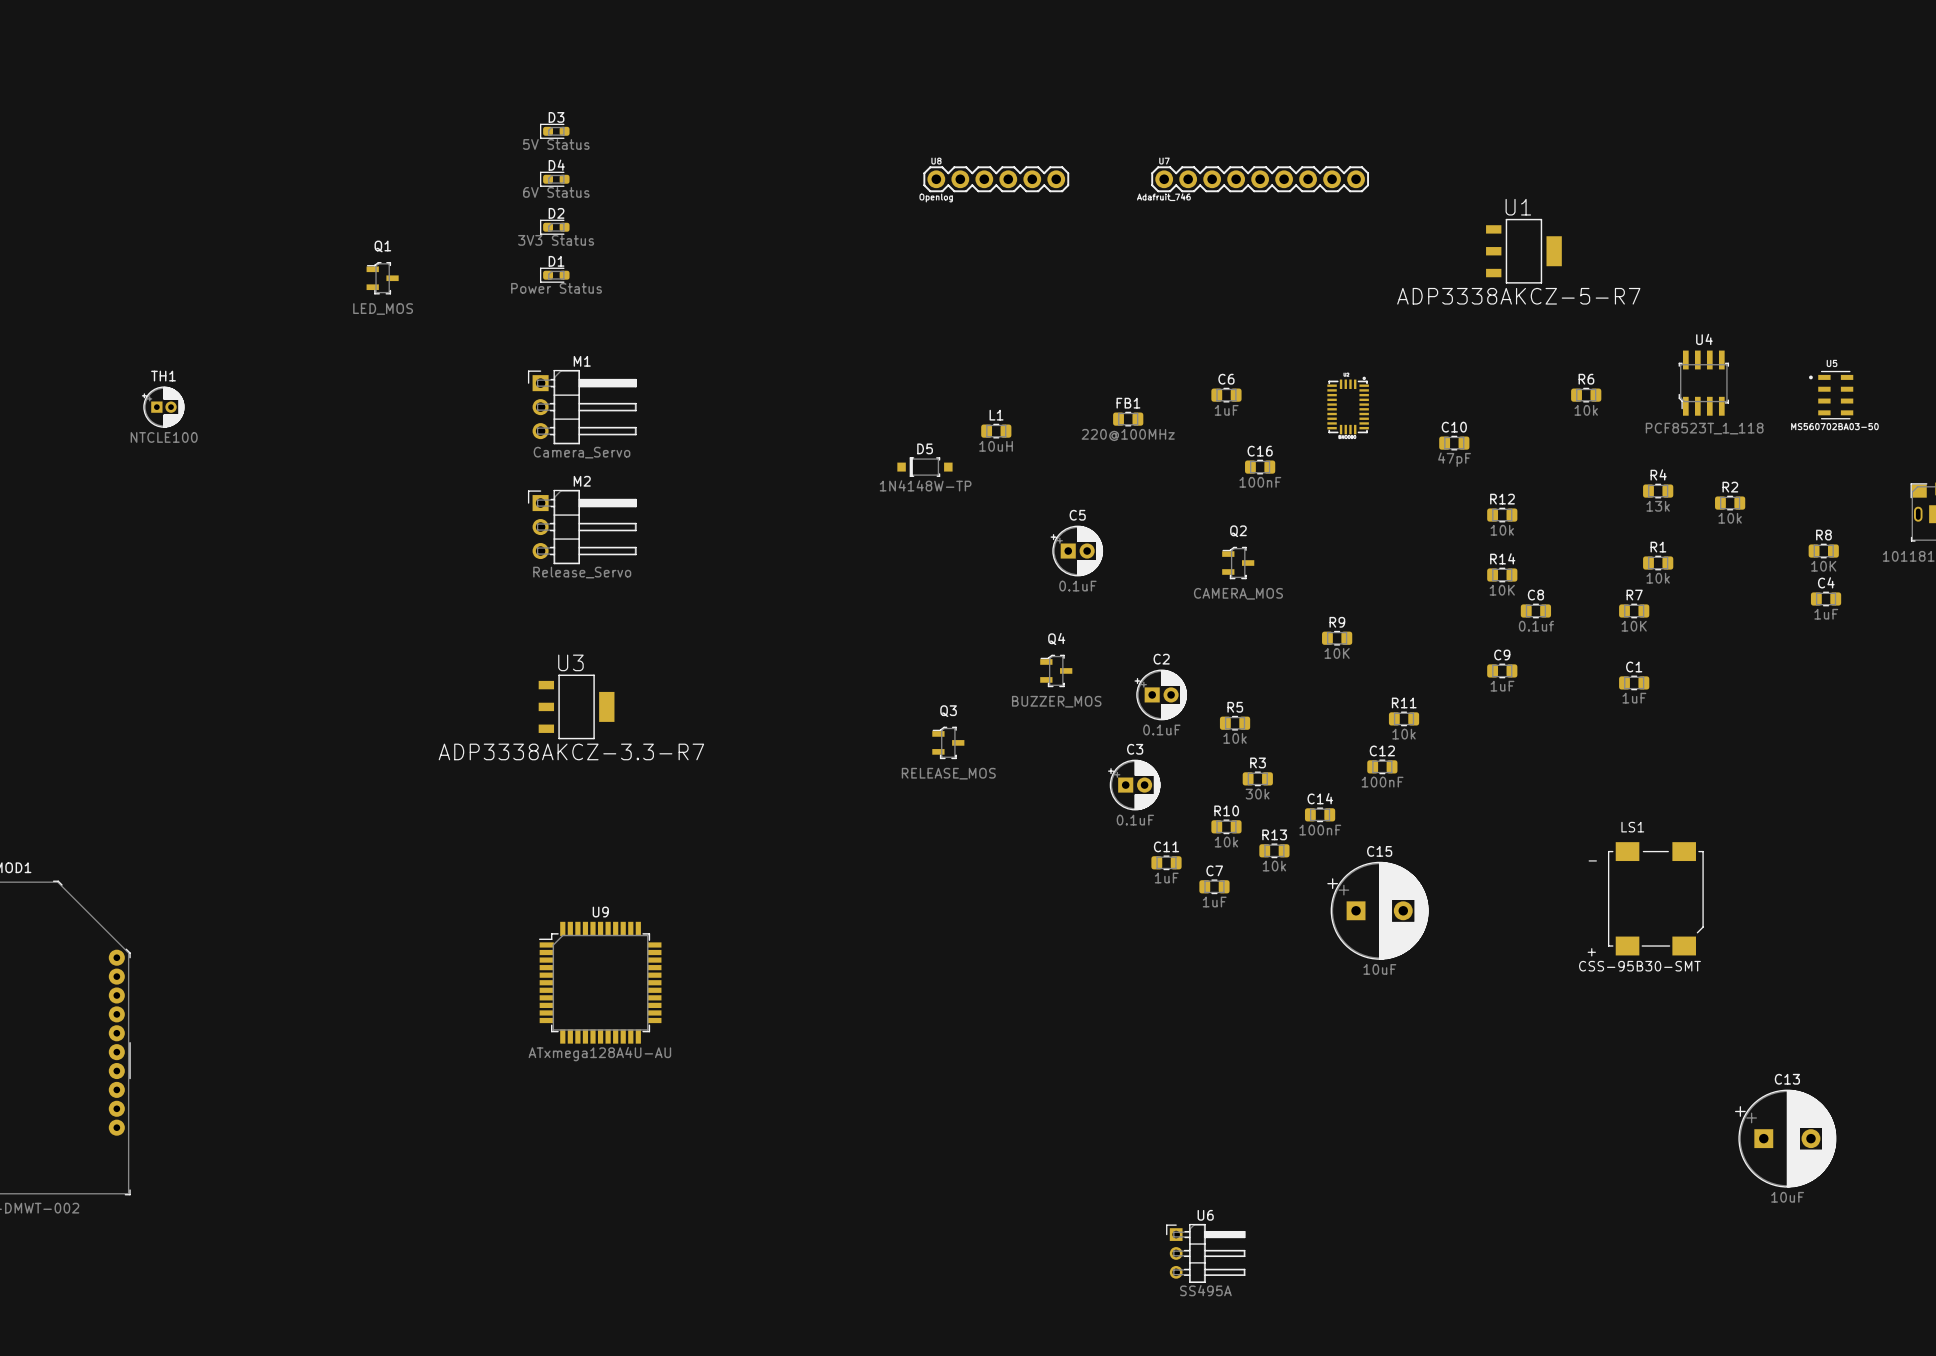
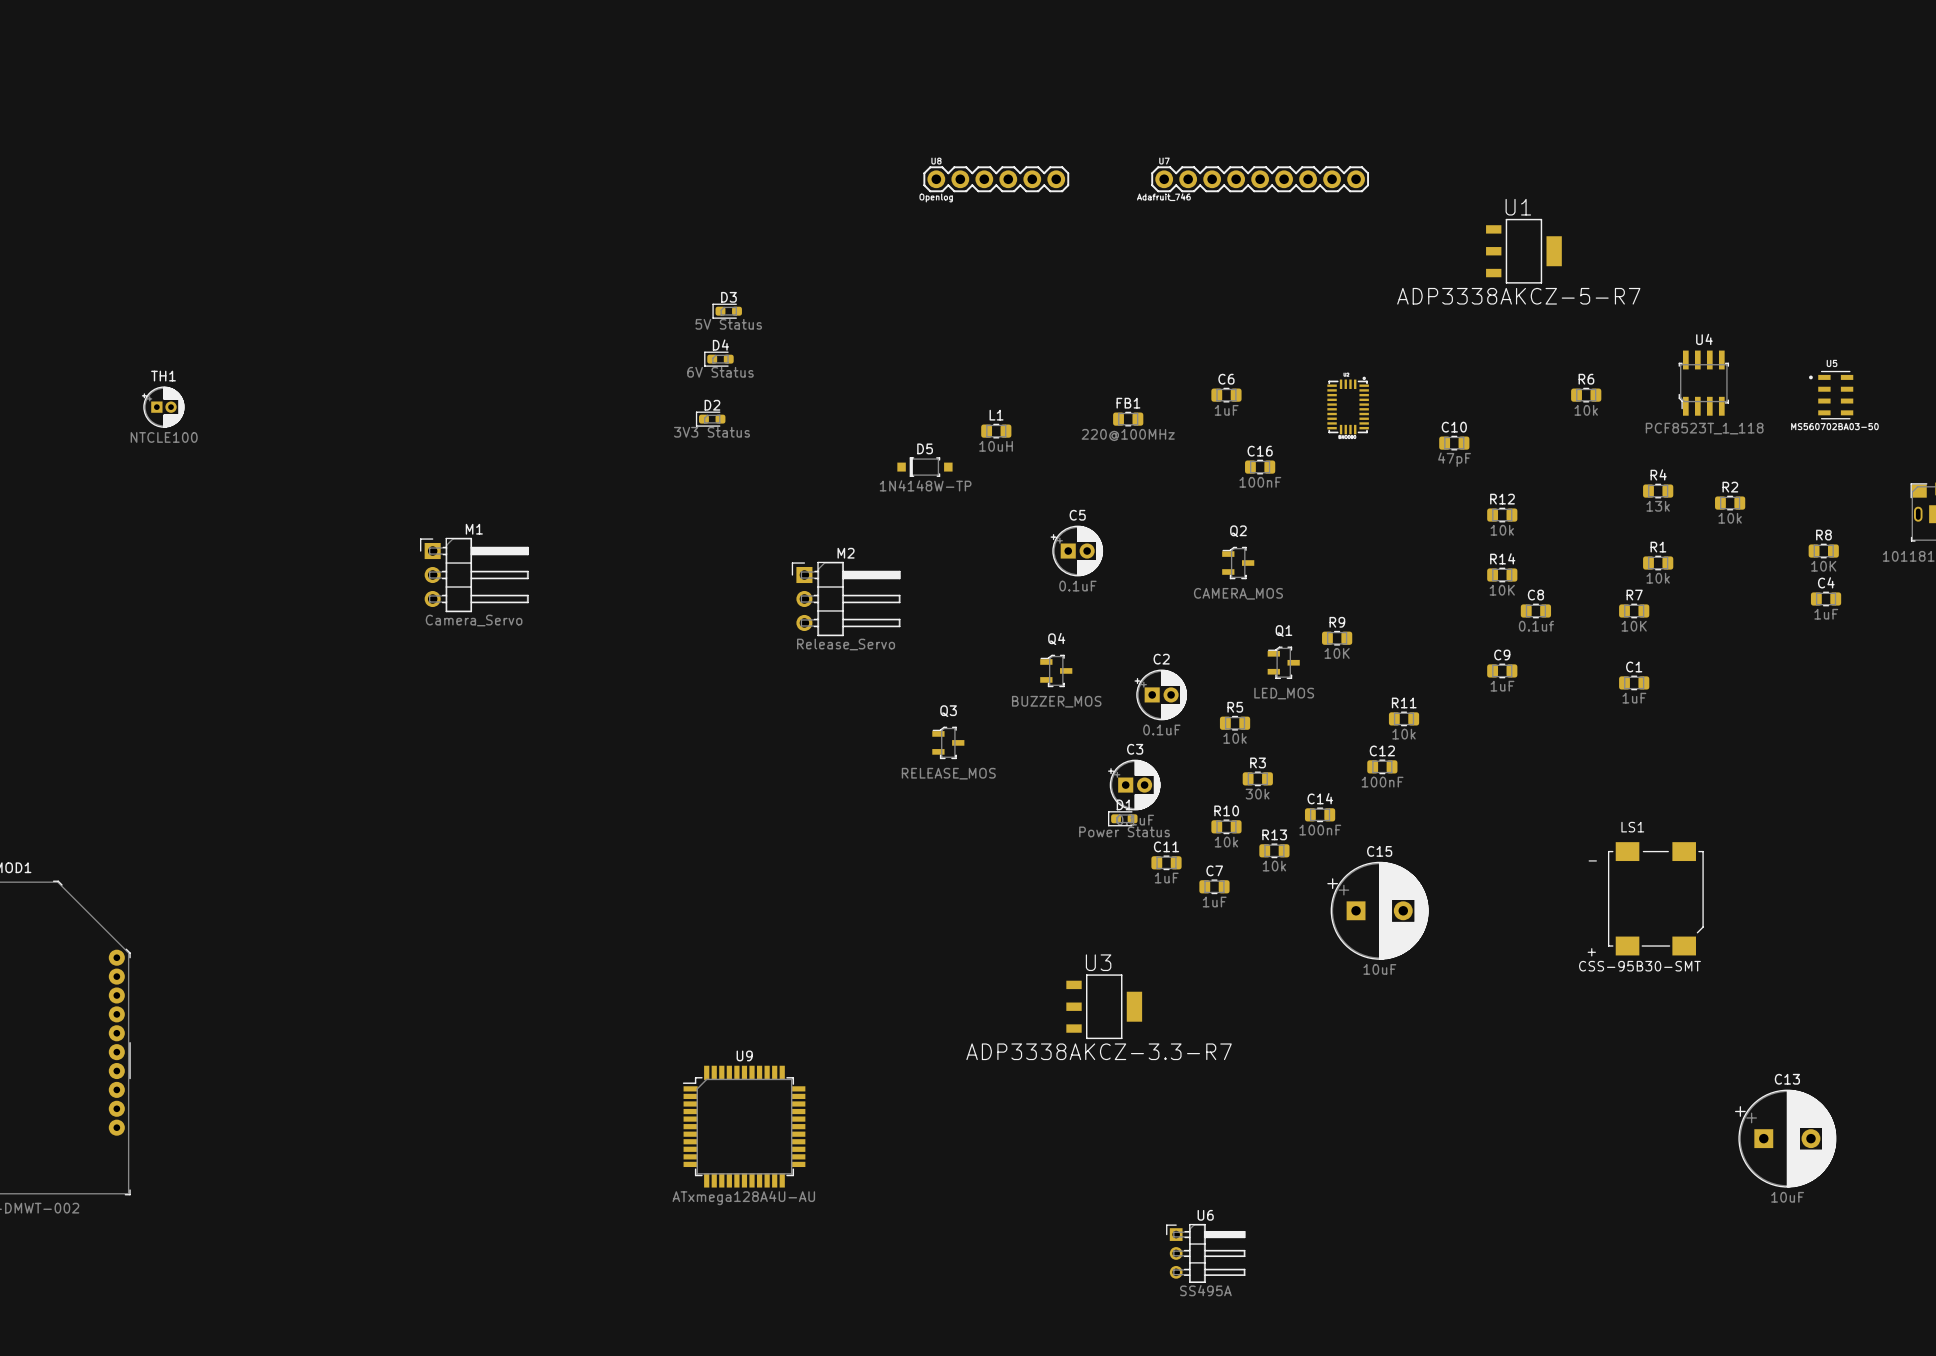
D3 position: (554, 131) -> (727, 311)
D4 position: (554, 179) -> (718, 359)
D2 position: (554, 227) -> (710, 419)
D1 position: (554, 275) -> (1122, 818)
Q1 position: (382, 278) -> (1283, 662)
M1 position: (582, 407) -> (474, 575)
M2 position: (582, 527) -> (846, 598)
U3 position: (576, 706) -> (1104, 1006)
U9 position: (600, 982) -> (744, 1126)

